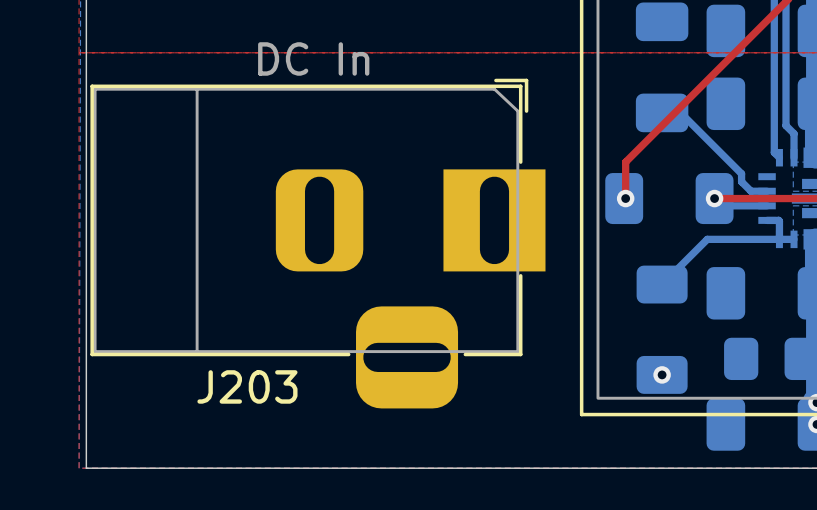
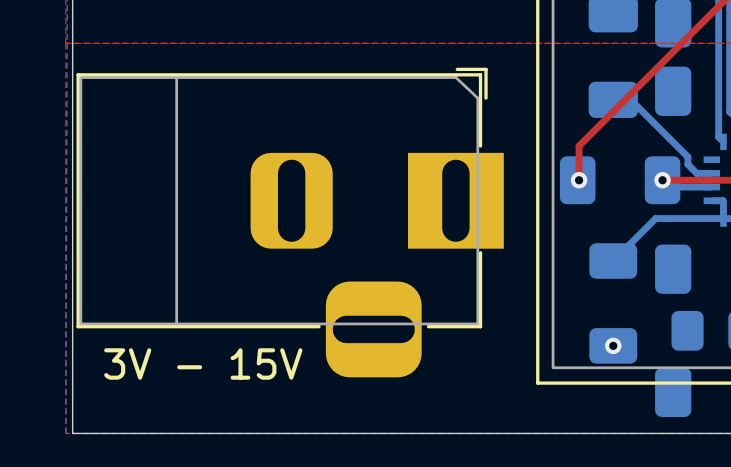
J203 value: DC In (313, 58) -> 3V - 15V (203, 364)
J203 name: J203 (247, 386) -> none

